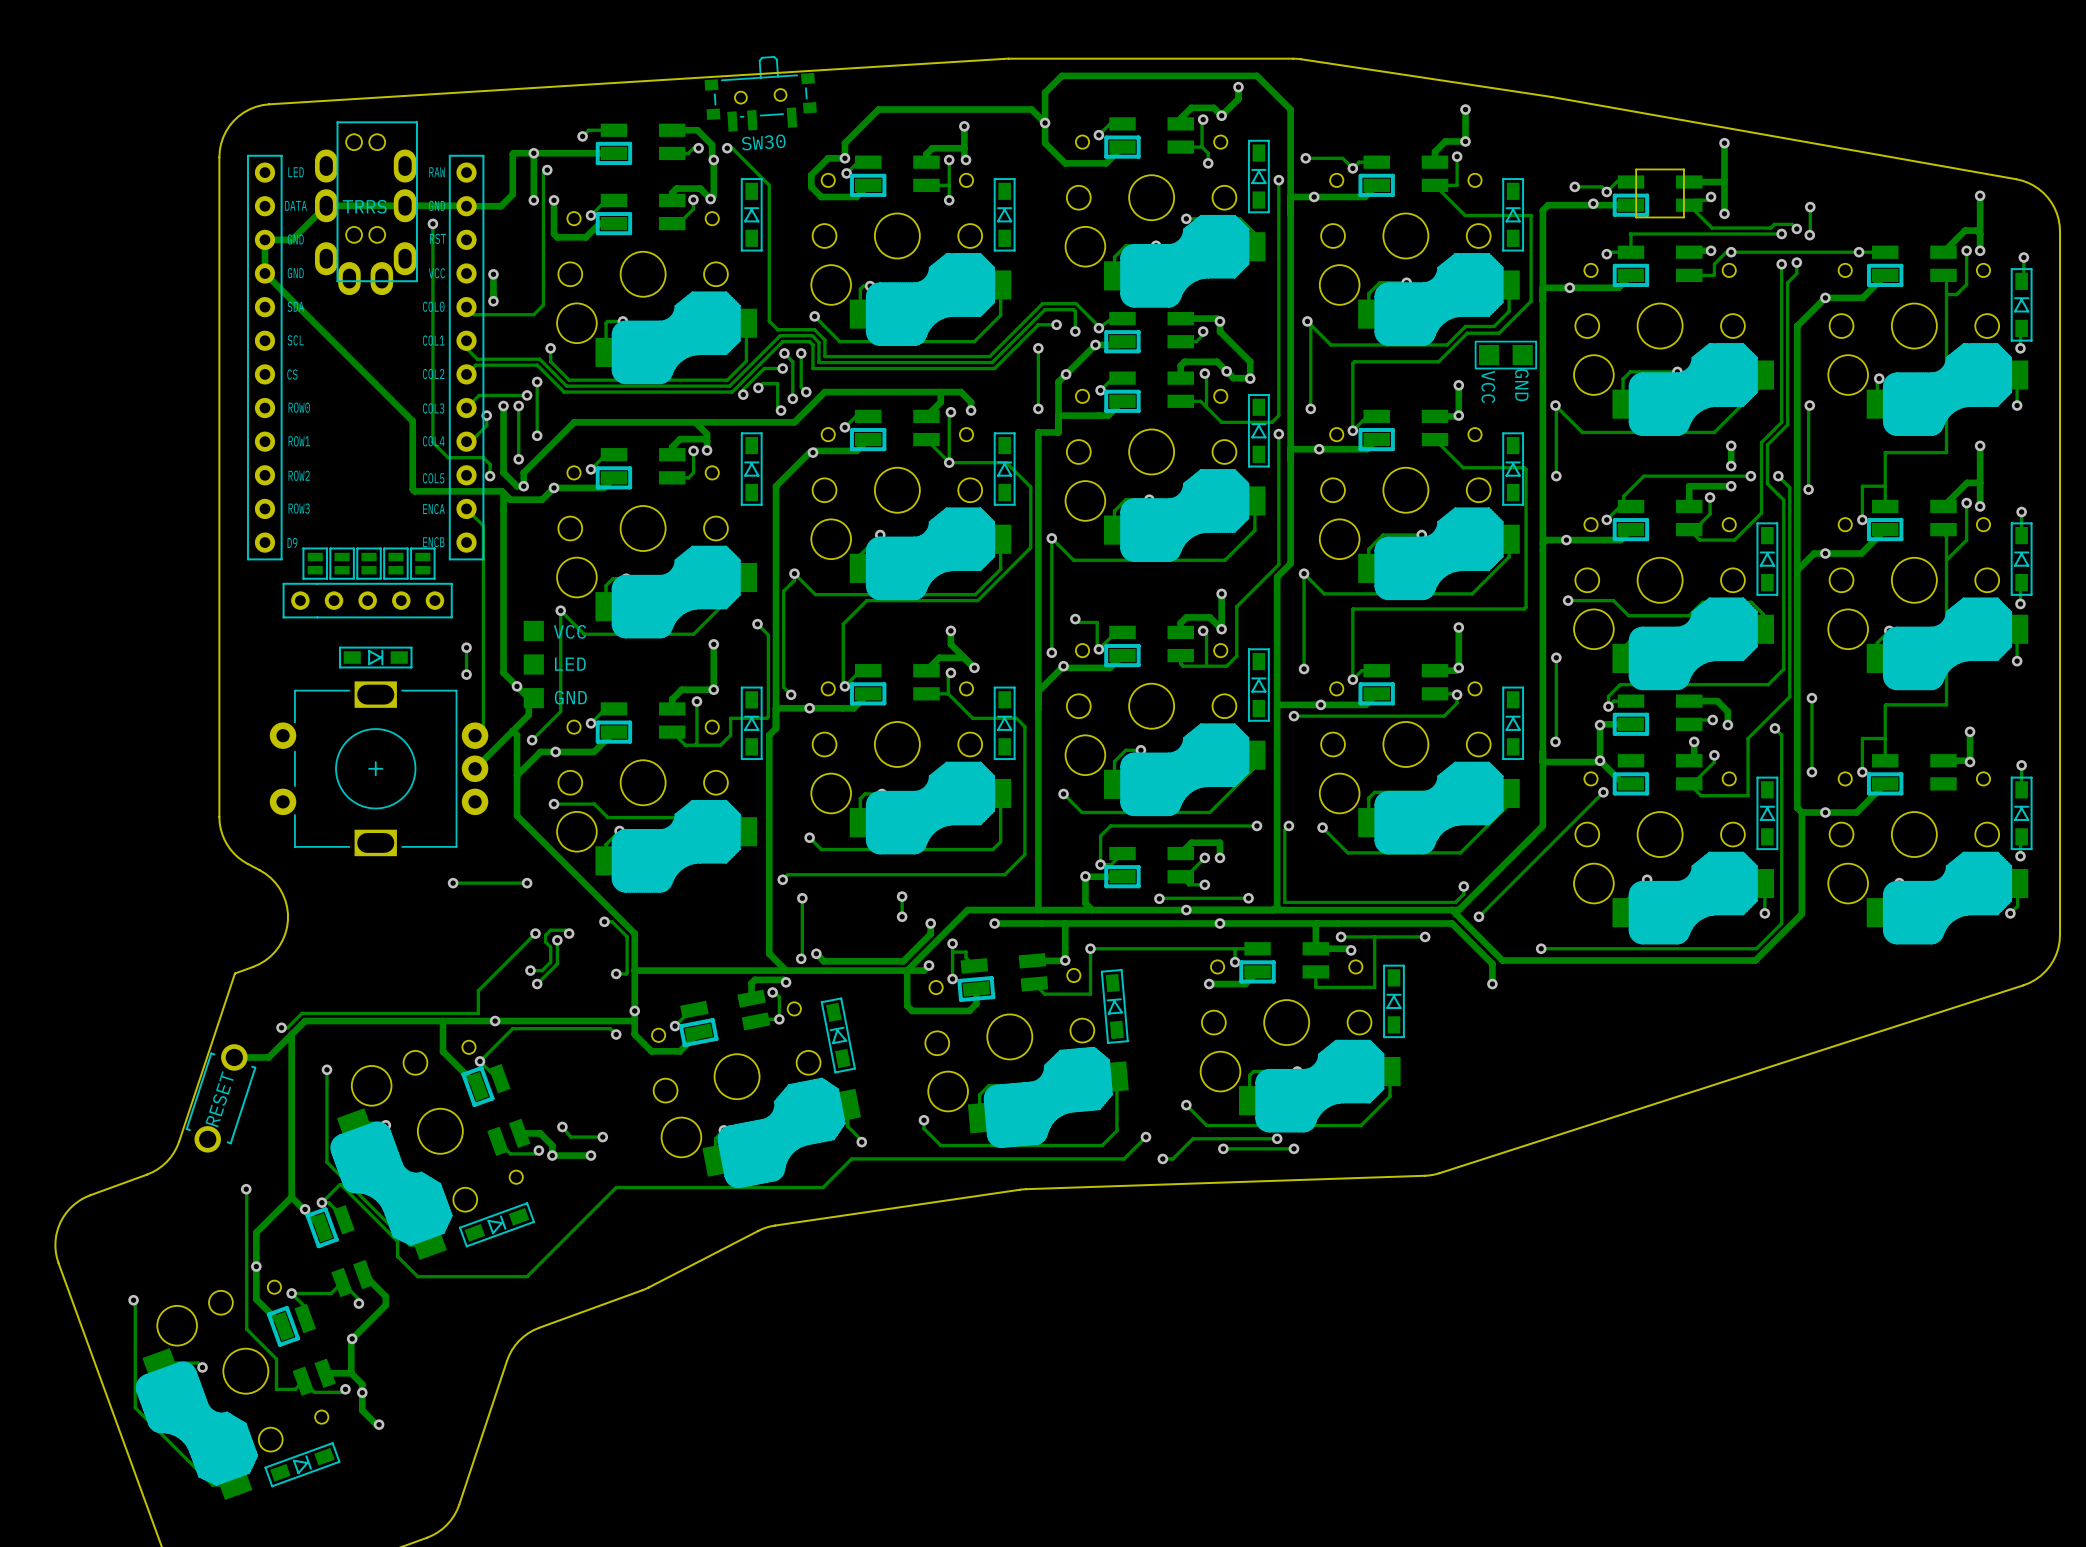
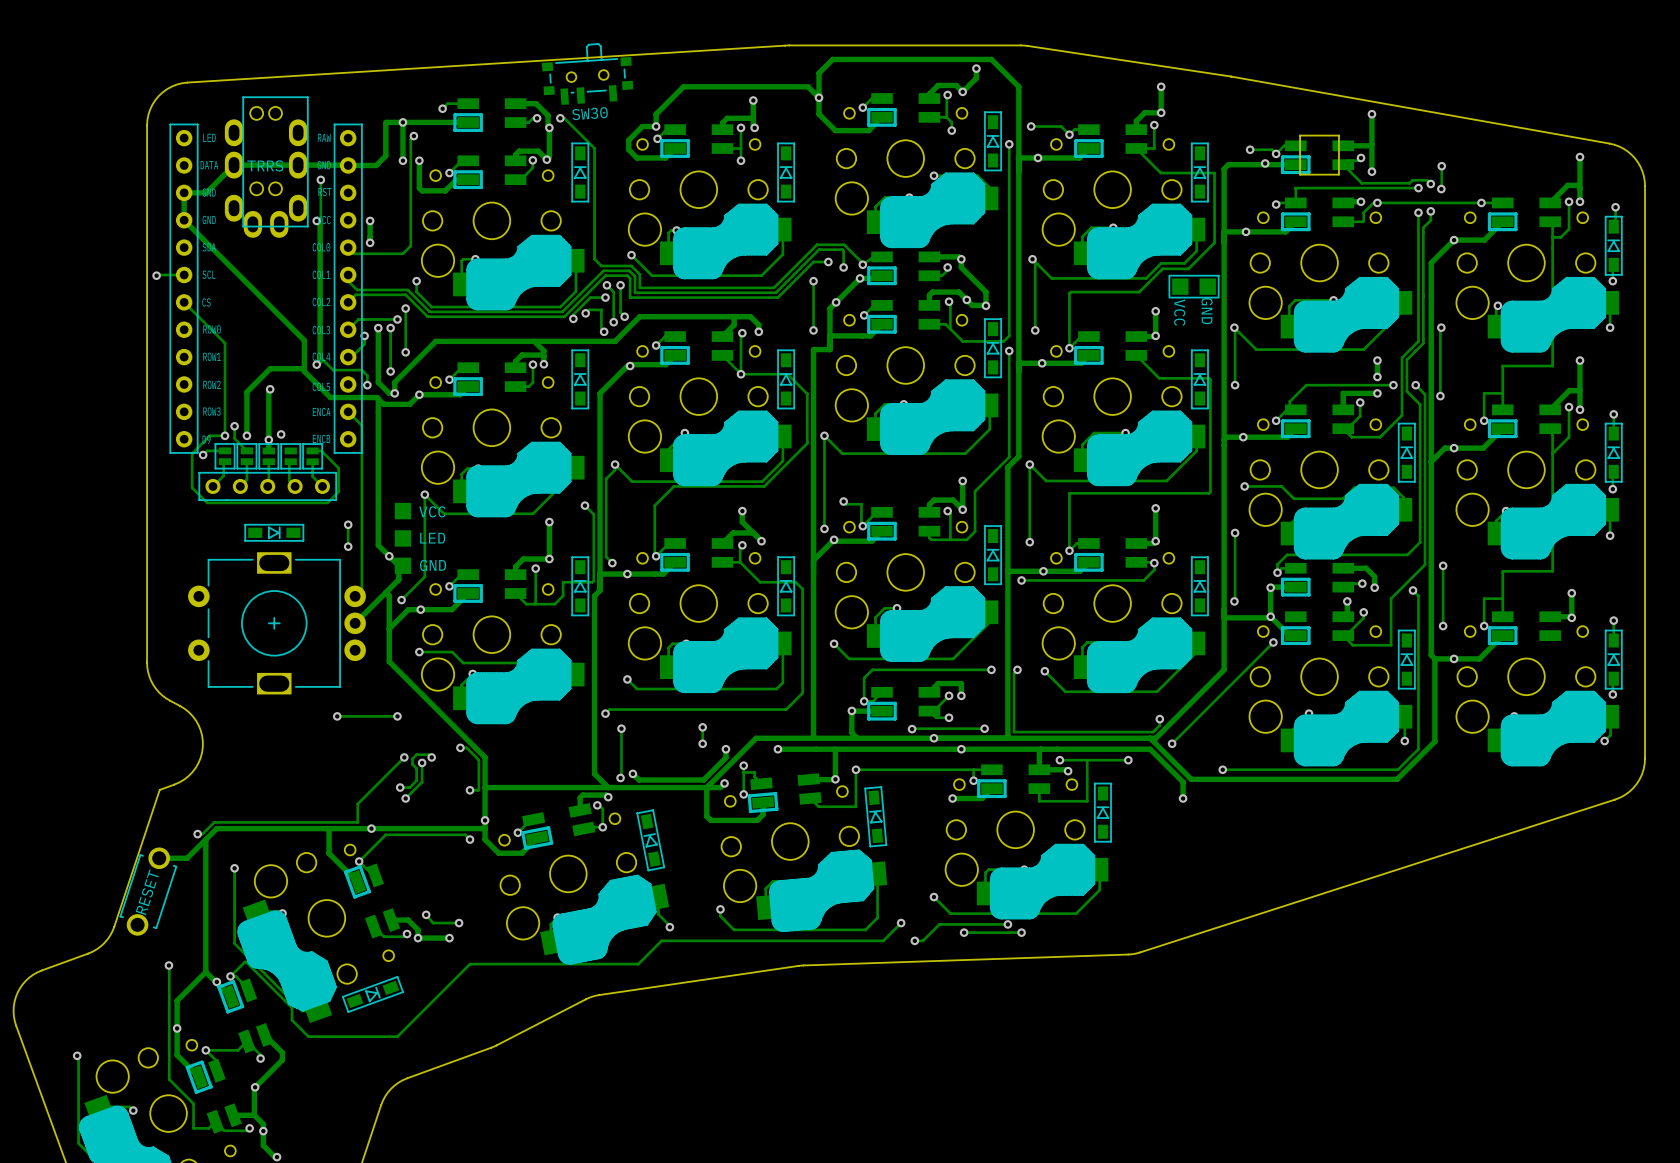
track: none -> (316, 220) (320, 224) (320, 361) (316, 364)
via: none -> (316, 220)
track: none -> (184, 274) (156, 275)
via: none -> (156, 275)
track: none -> (184, 302) (225, 343) (225, 435) (209, 435) (192, 453) (192, 487) (207, 502) (327, 502) (338, 491) (338, 468) (321, 450) (312, 450)
via: none -> (316, 364)
track: none -> (304, 368) (270, 368) (246, 392) (246, 435)
track: (412, 459) (412, 489) (414, 491) (444, 491) -> (304, 371) (330, 397)
track: none -> (270, 389) (268, 450)
via: none -> (270, 389)
track: none -> (234, 426) (234, 438) (246, 450)
via: none -> (234, 426)
via: none -> (281, 434)
via: none -> (225, 435)
via: none -> (246, 435)
via: none -> (268, 439)
track: none -> (225, 450) (207, 450) (203, 454)
via: none -> (203, 454)
track: none -> (225, 461) (223, 475) (212, 486) (212, 492)
track: none -> (246, 461) (246, 479) (240, 486)
track: none -> (268, 461) (267, 486)
track: none -> (290, 461) (289, 480) (295, 486)
track: none -> (312, 461) (312, 476) (322, 486)

